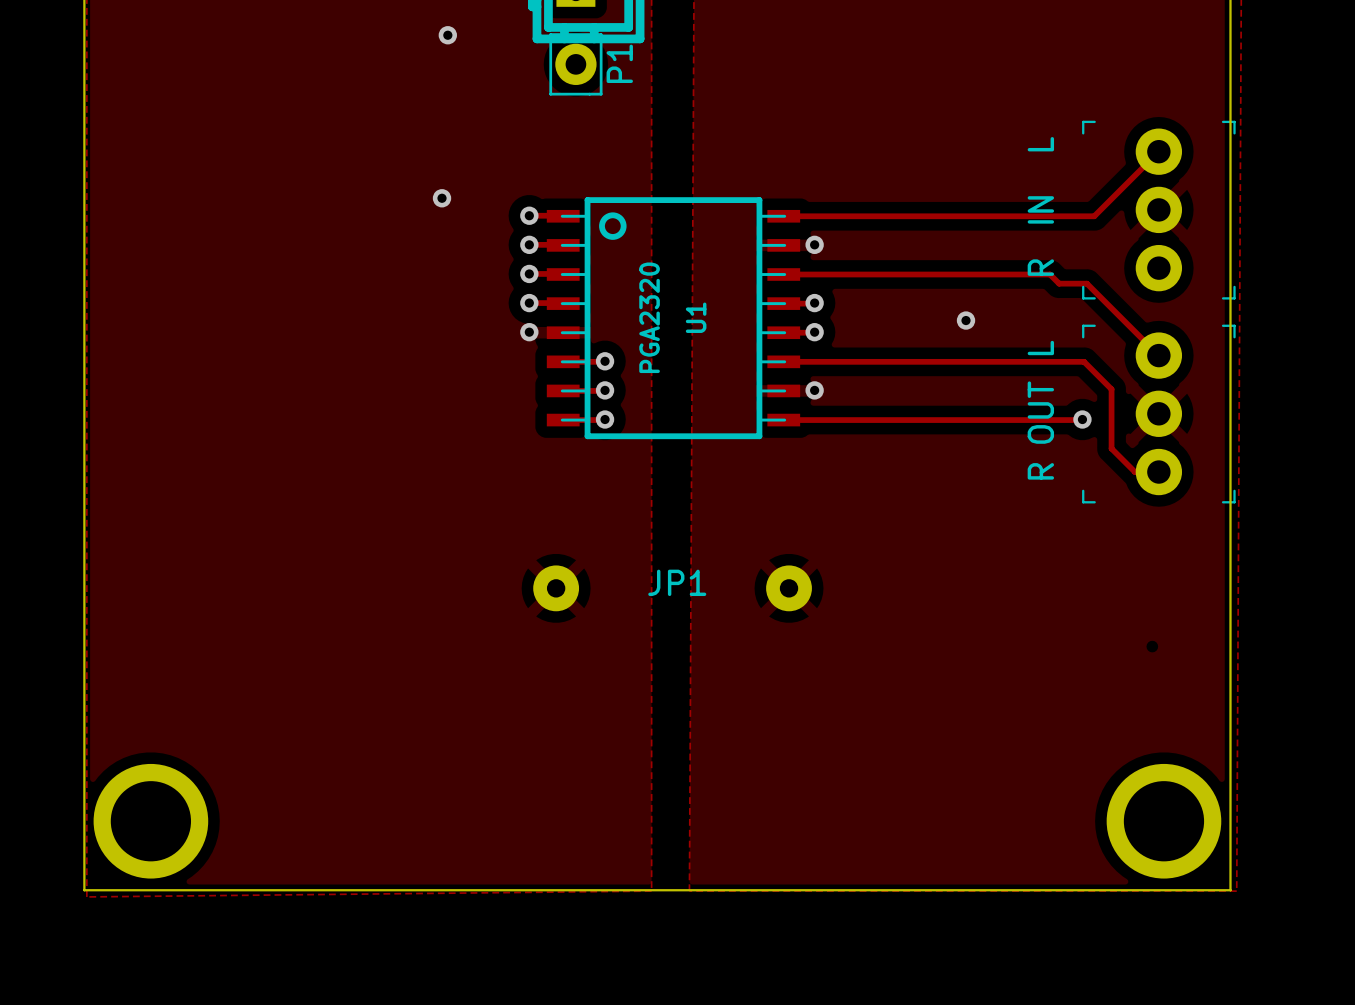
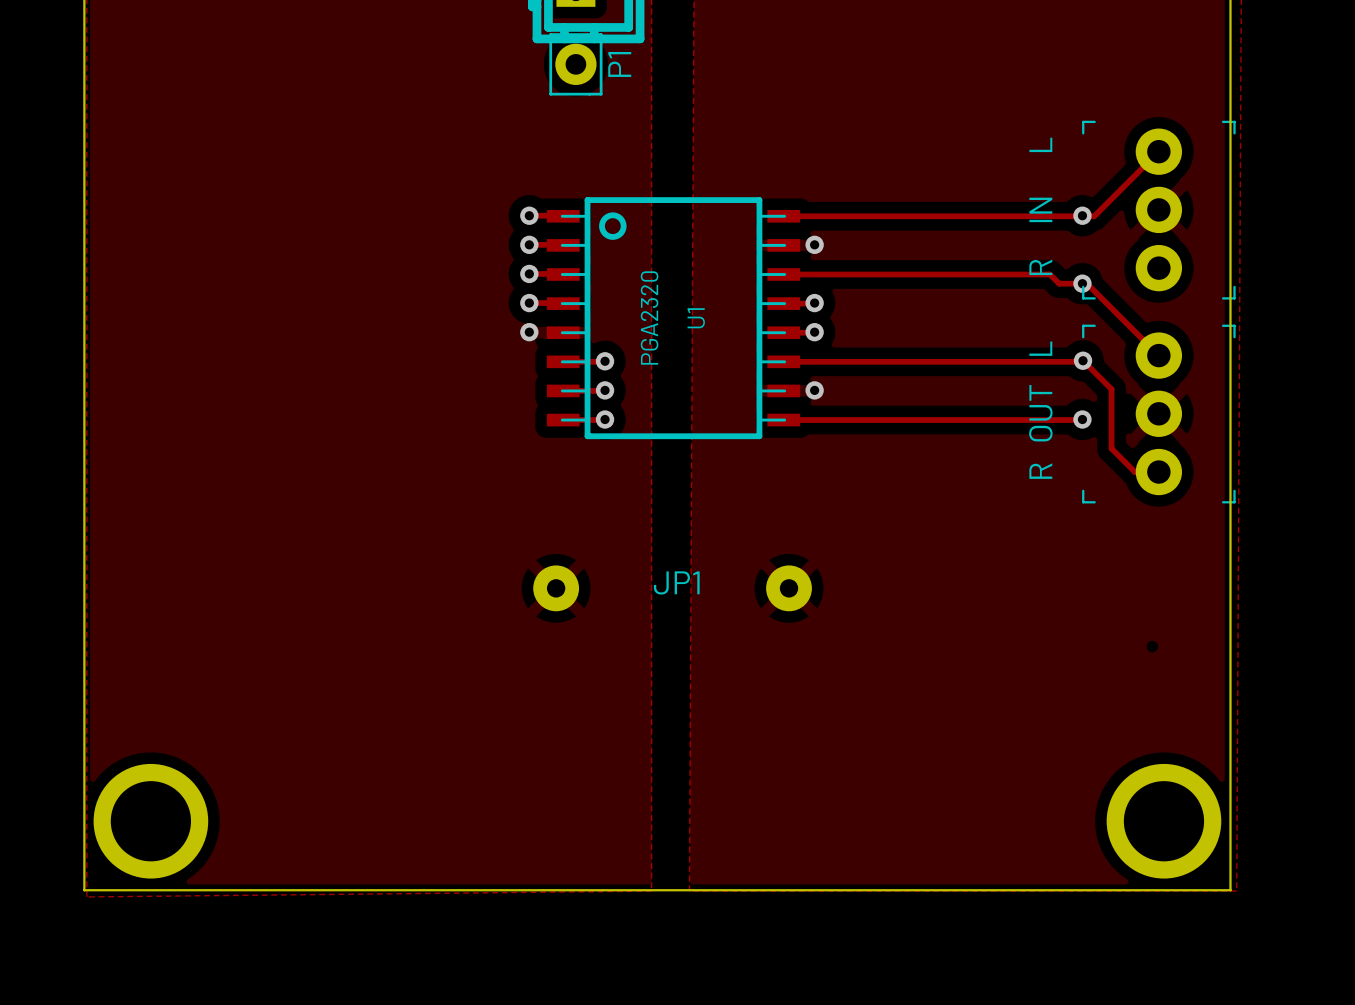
via: (447, 35) -> none
via: (442, 198) -> none
via: none -> (1082, 215)
via: none -> (1082, 283)
via: (966, 320) -> none
via: none -> (1083, 360)

